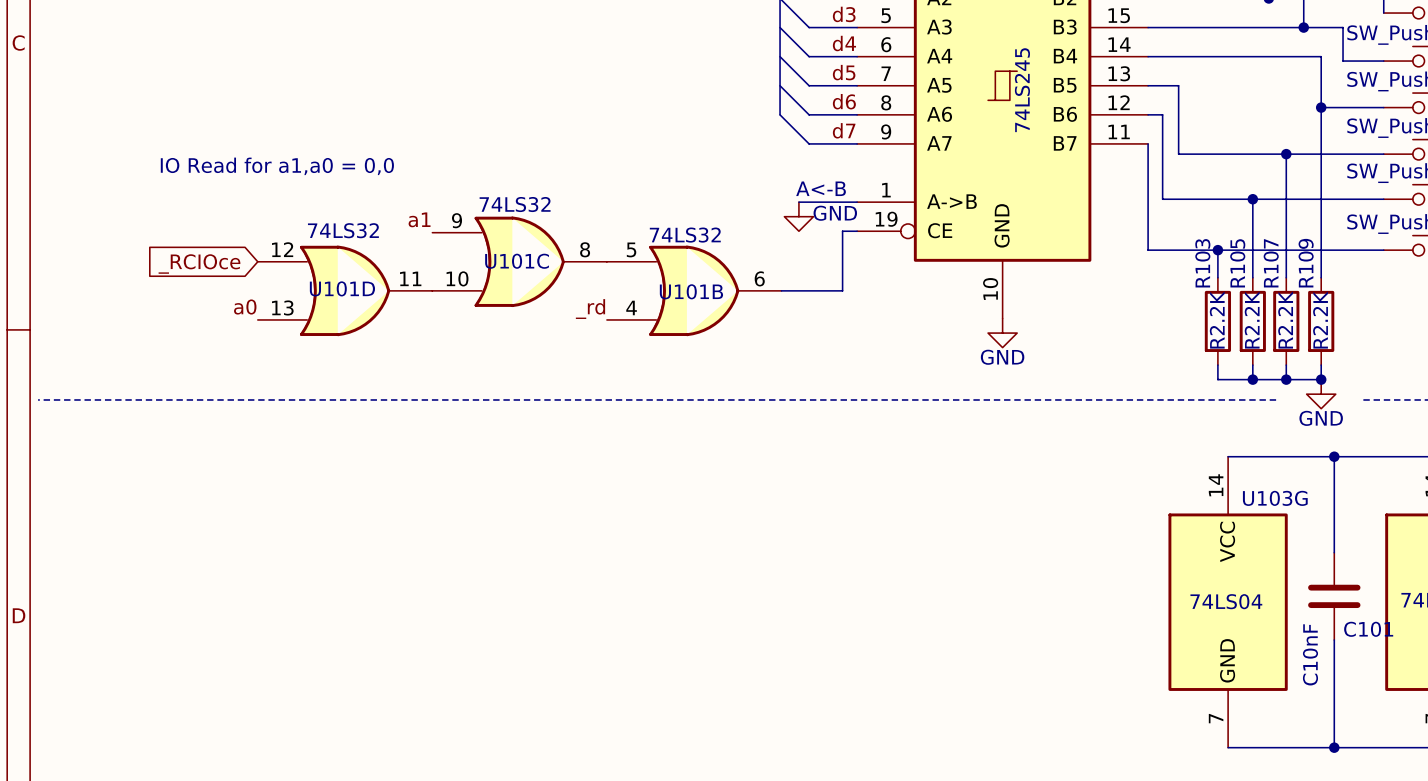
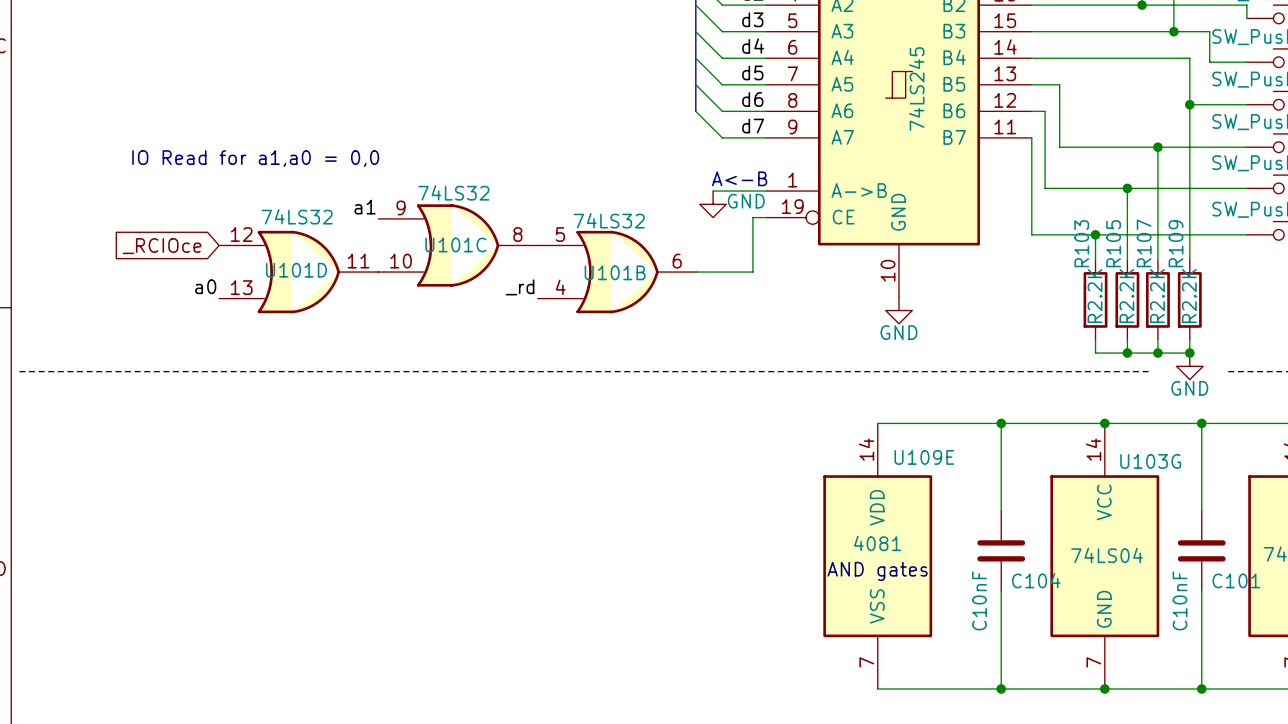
wire: none -> (877, 423) (1104, 423)
wire: none -> (1001, 423) (1001, 511)
junction: none -> (1001, 423)
junction: none -> (1104, 423)
C104: none -> C10nF (1001, 550)
U109E: none -> 4081 (877, 556)
text: none -> AND gates (877, 571)
wire: none -> (1001, 590) (1001, 688)
wire: none -> (877, 688) (1104, 688)
junction: none -> (1001, 688)
junction: none -> (1104, 688)

